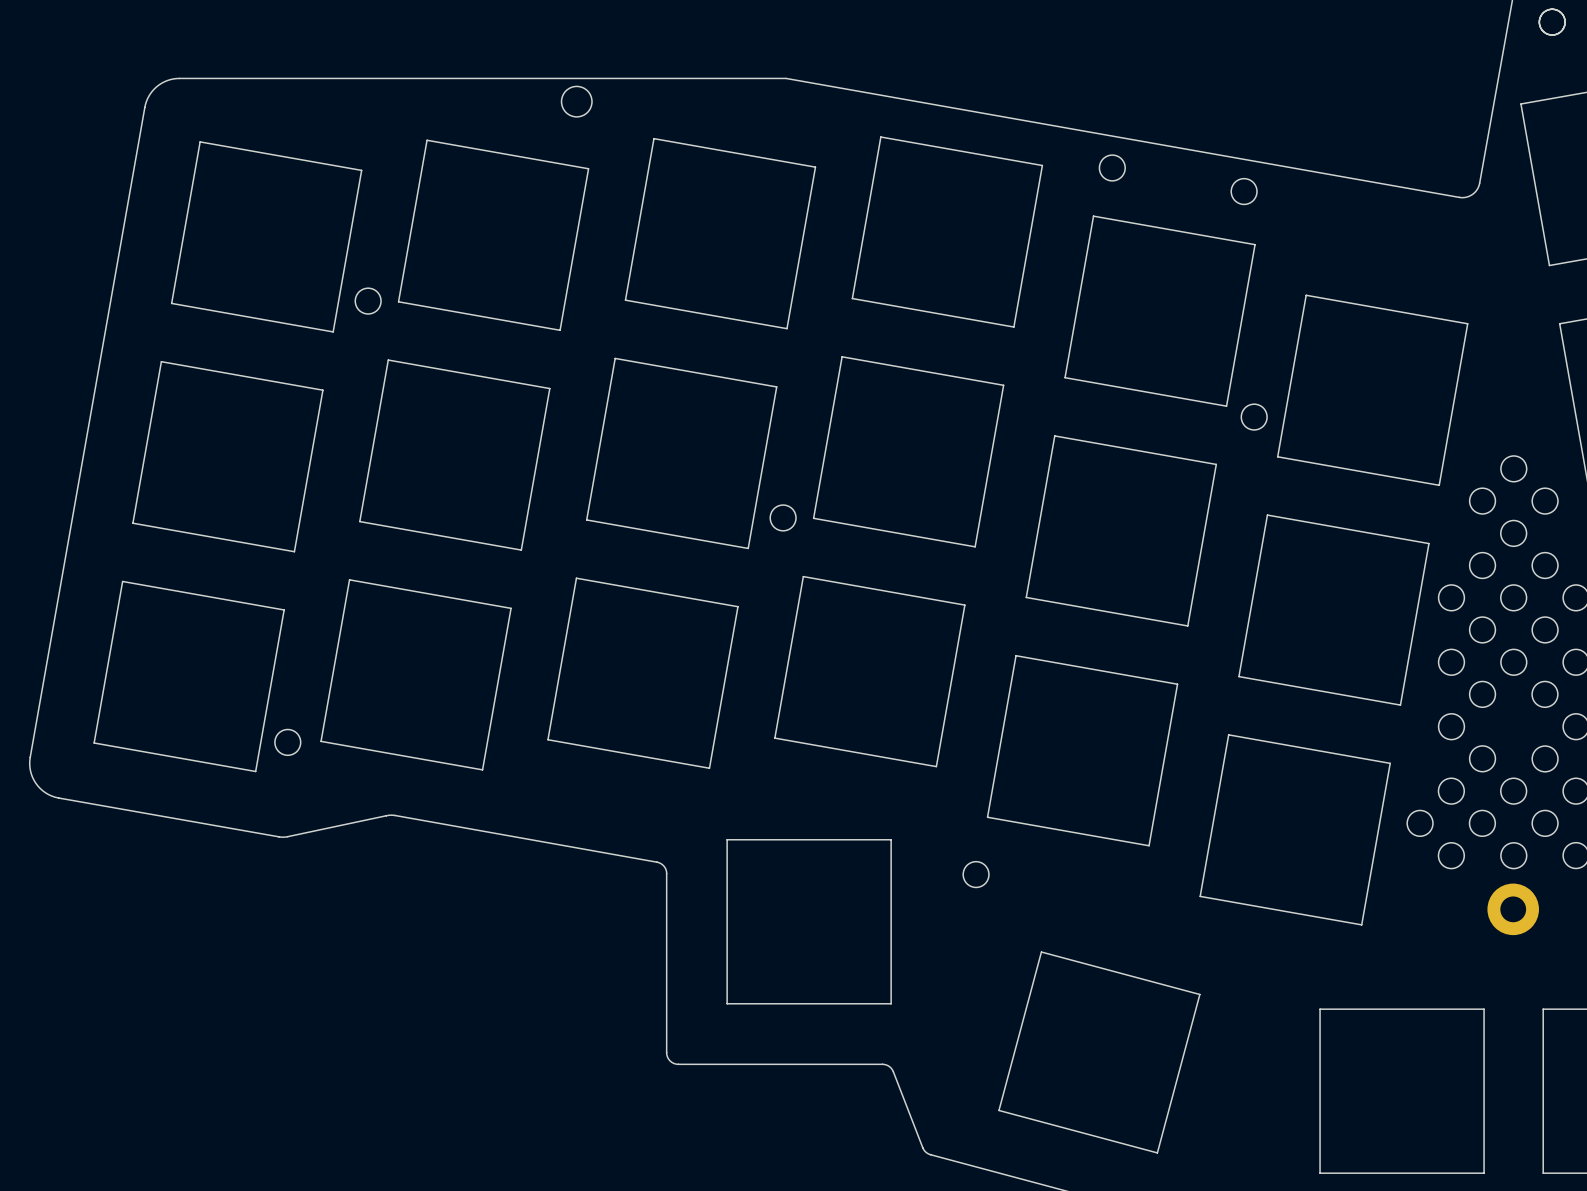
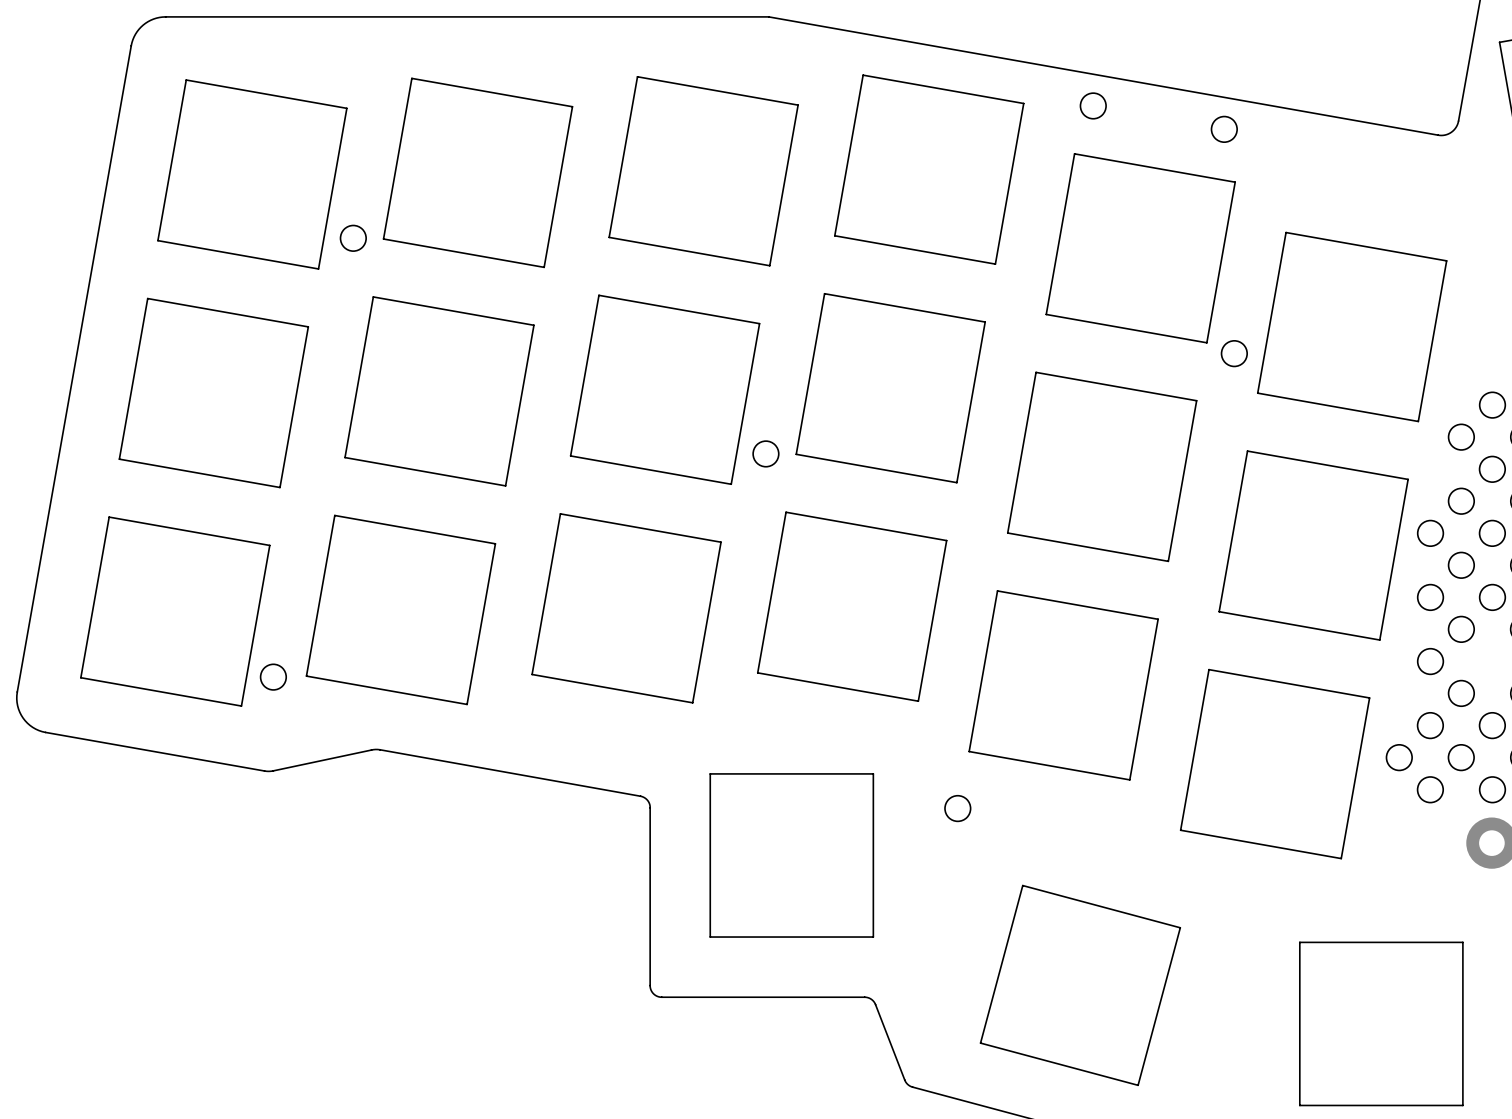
round board edge: [561, 86, 593, 118] -> none

